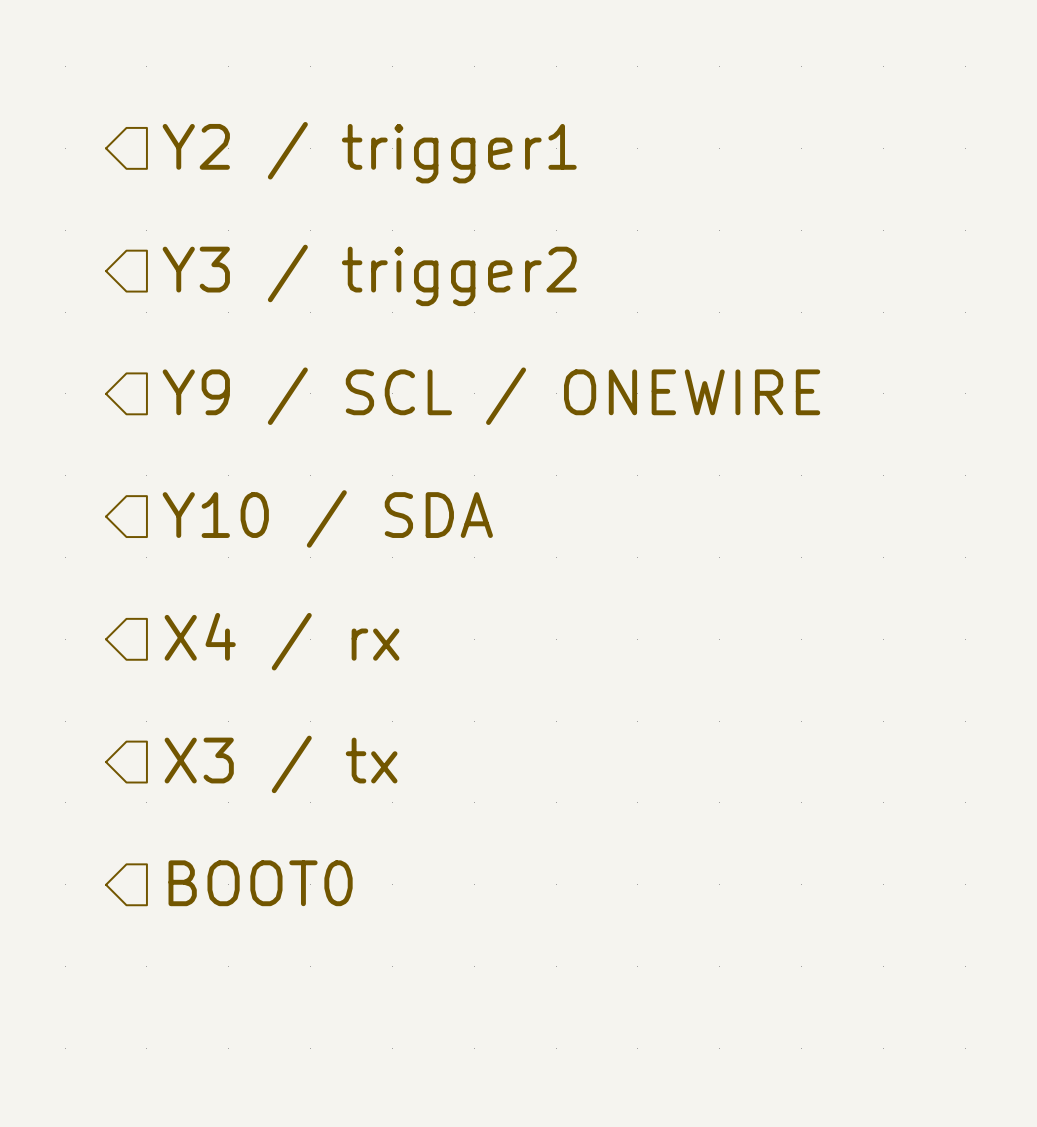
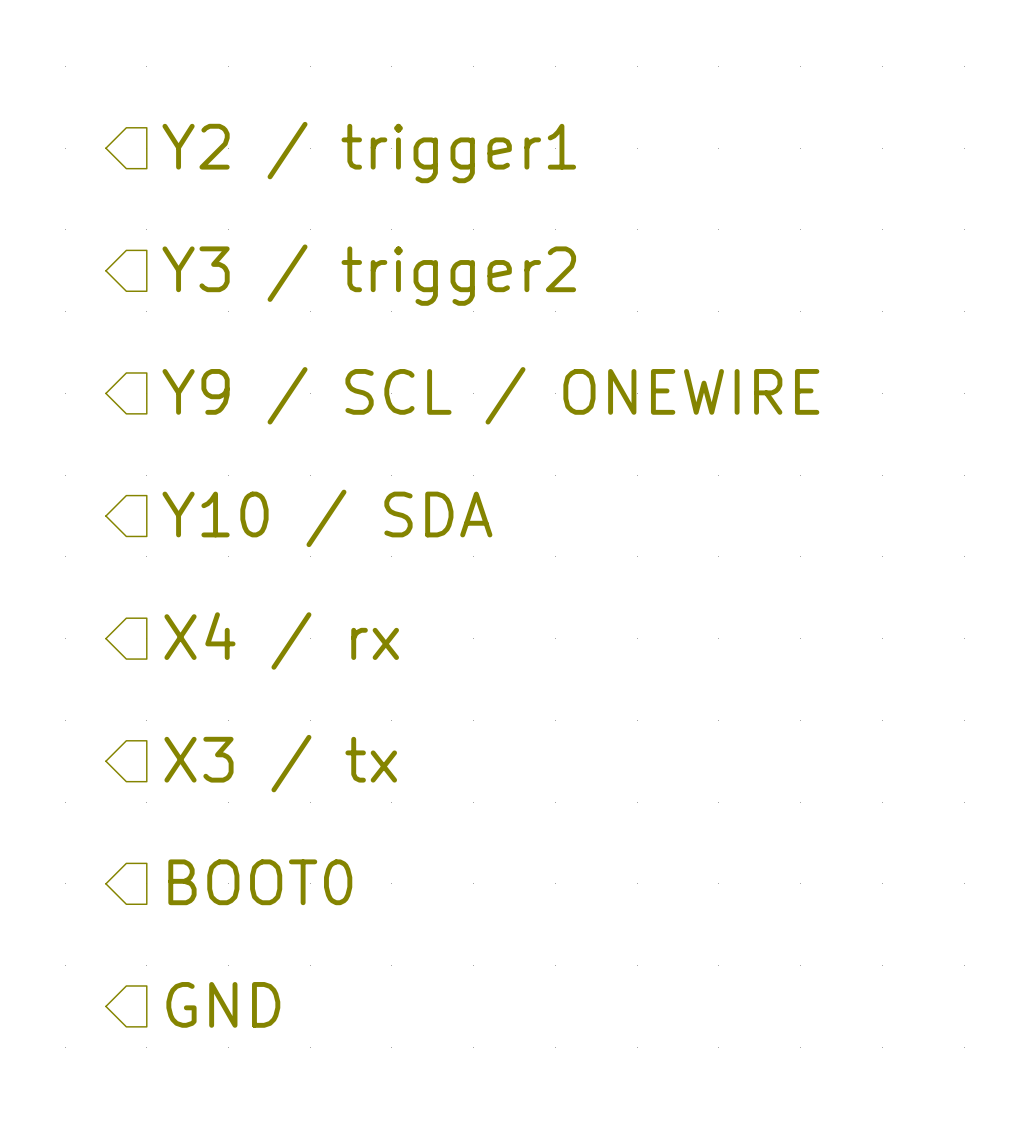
hierarchical label: none -> GND (223, 1004)

